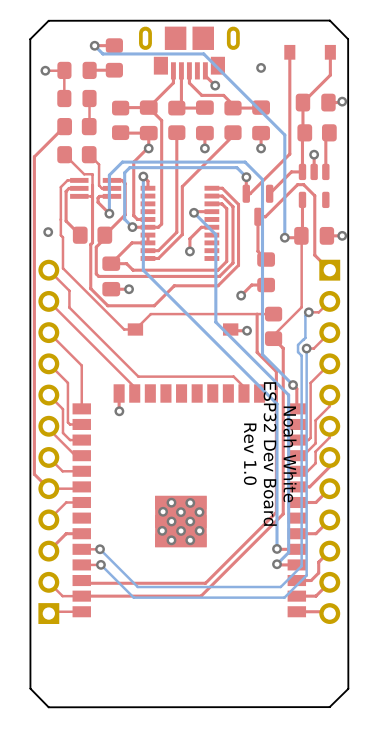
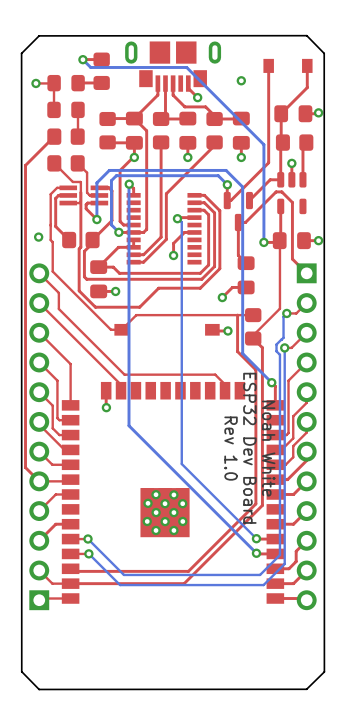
bottom track: (143, 176) (143, 270) (277, 403) (277, 548) -> (129, 184) (129, 425) (256, 553)
bottom track: (194, 212) (215, 234) (215, 322) (288, 394) (288, 552) (277, 564) -> none
bottom track: none -> (177, 218) (181, 222) (181, 464) (256, 538)

